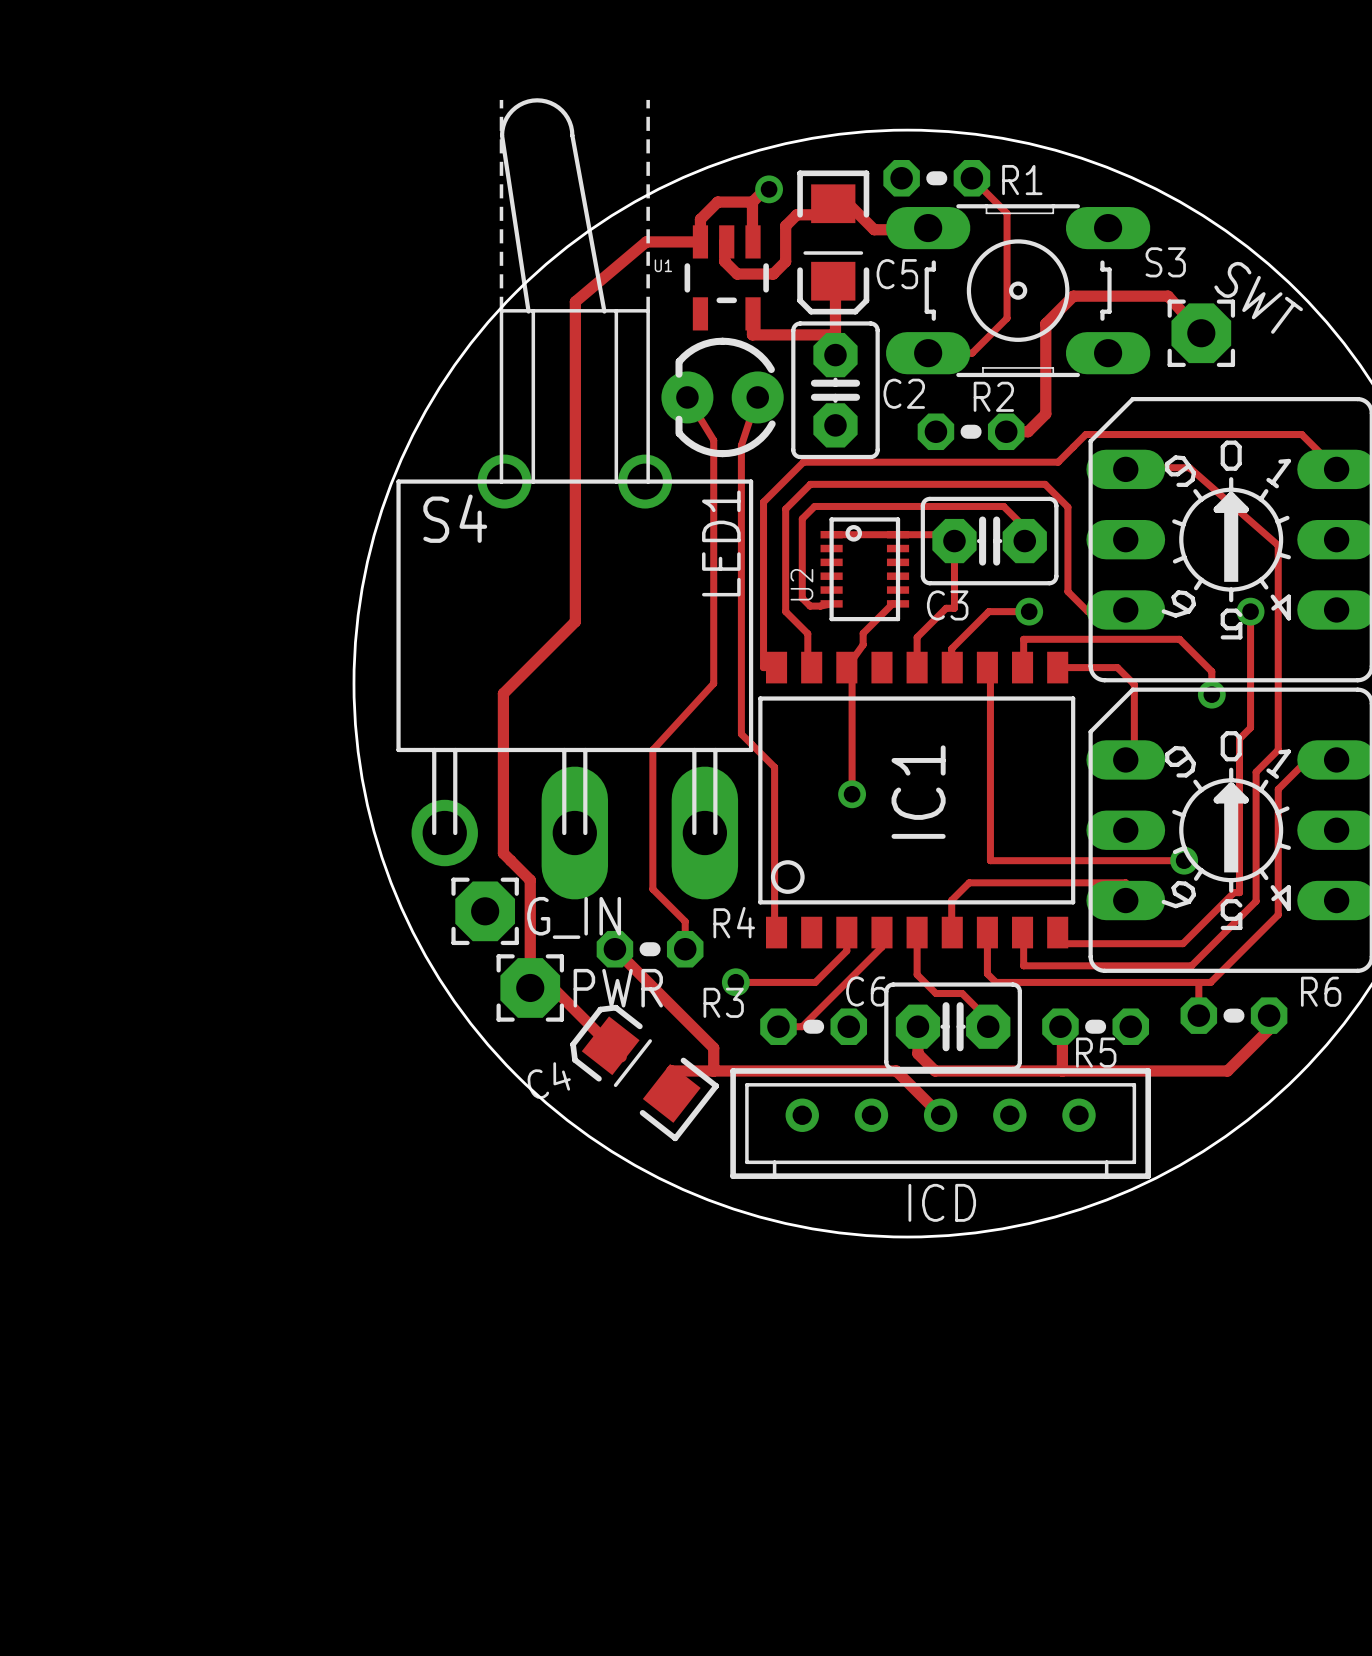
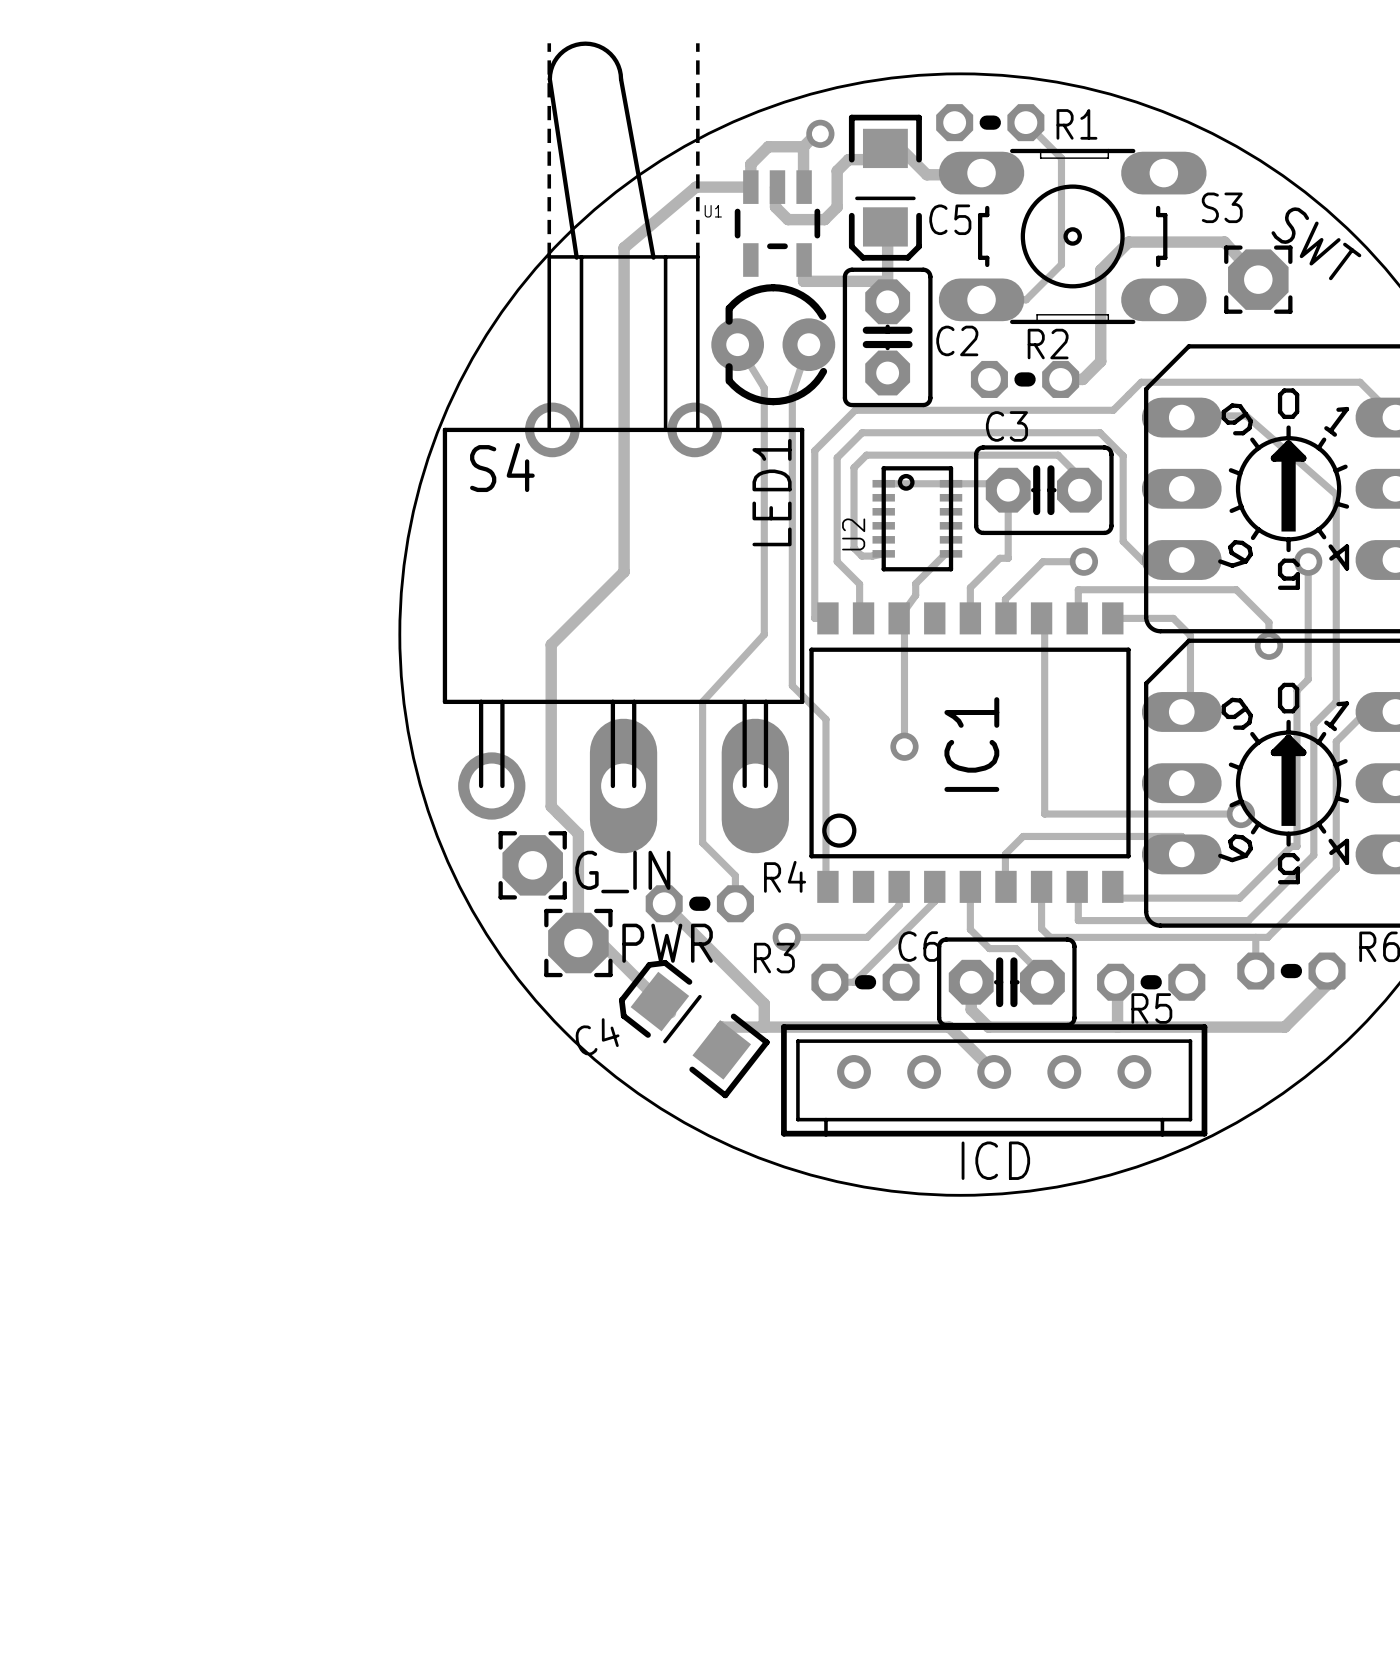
C3 name position: C3 (947, 605) -> C3 (1006, 426)

